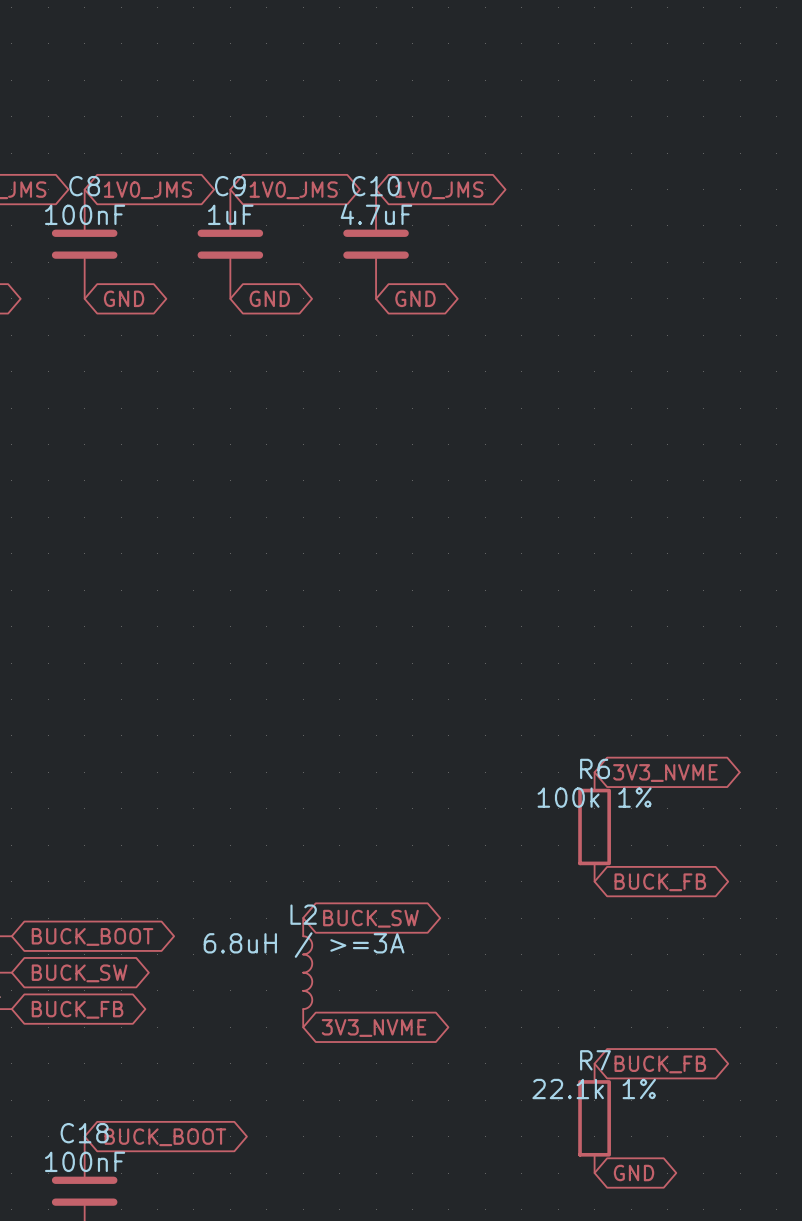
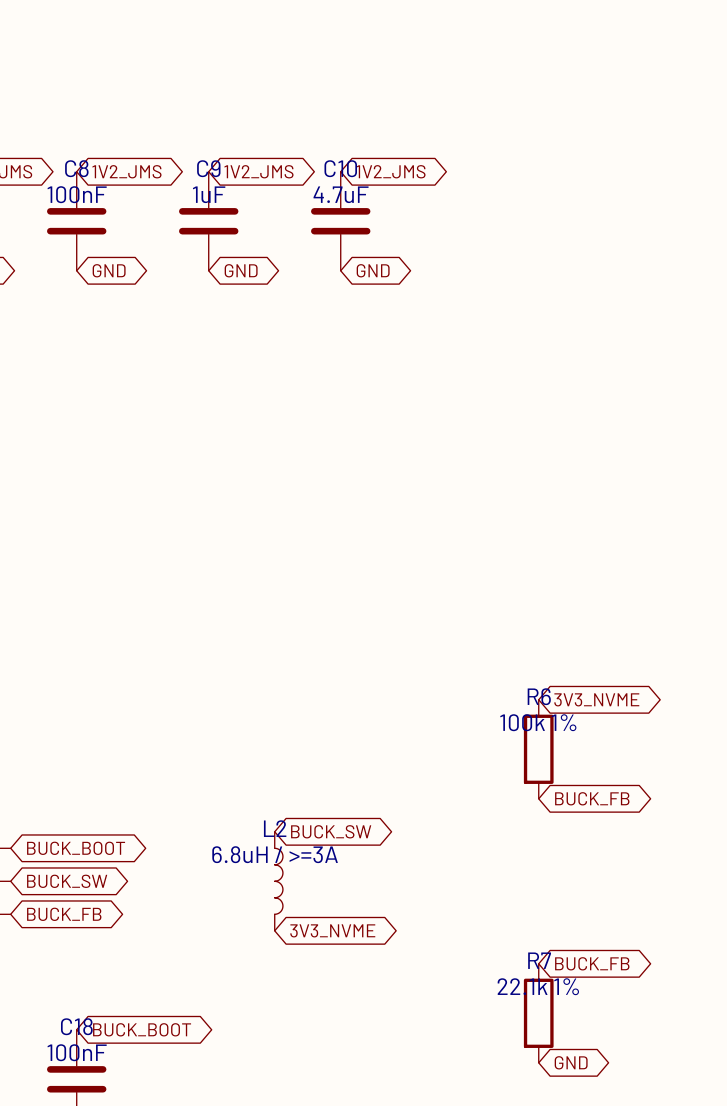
global label: 1V0_JMS (147, 190) -> 1V2_JMS (126, 171)
global label: 1V0_JMS (293, 190) -> 1V2_JMS (258, 171)
global label: 1V0_JMS (439, 190) -> 1V2_JMS (390, 171)

